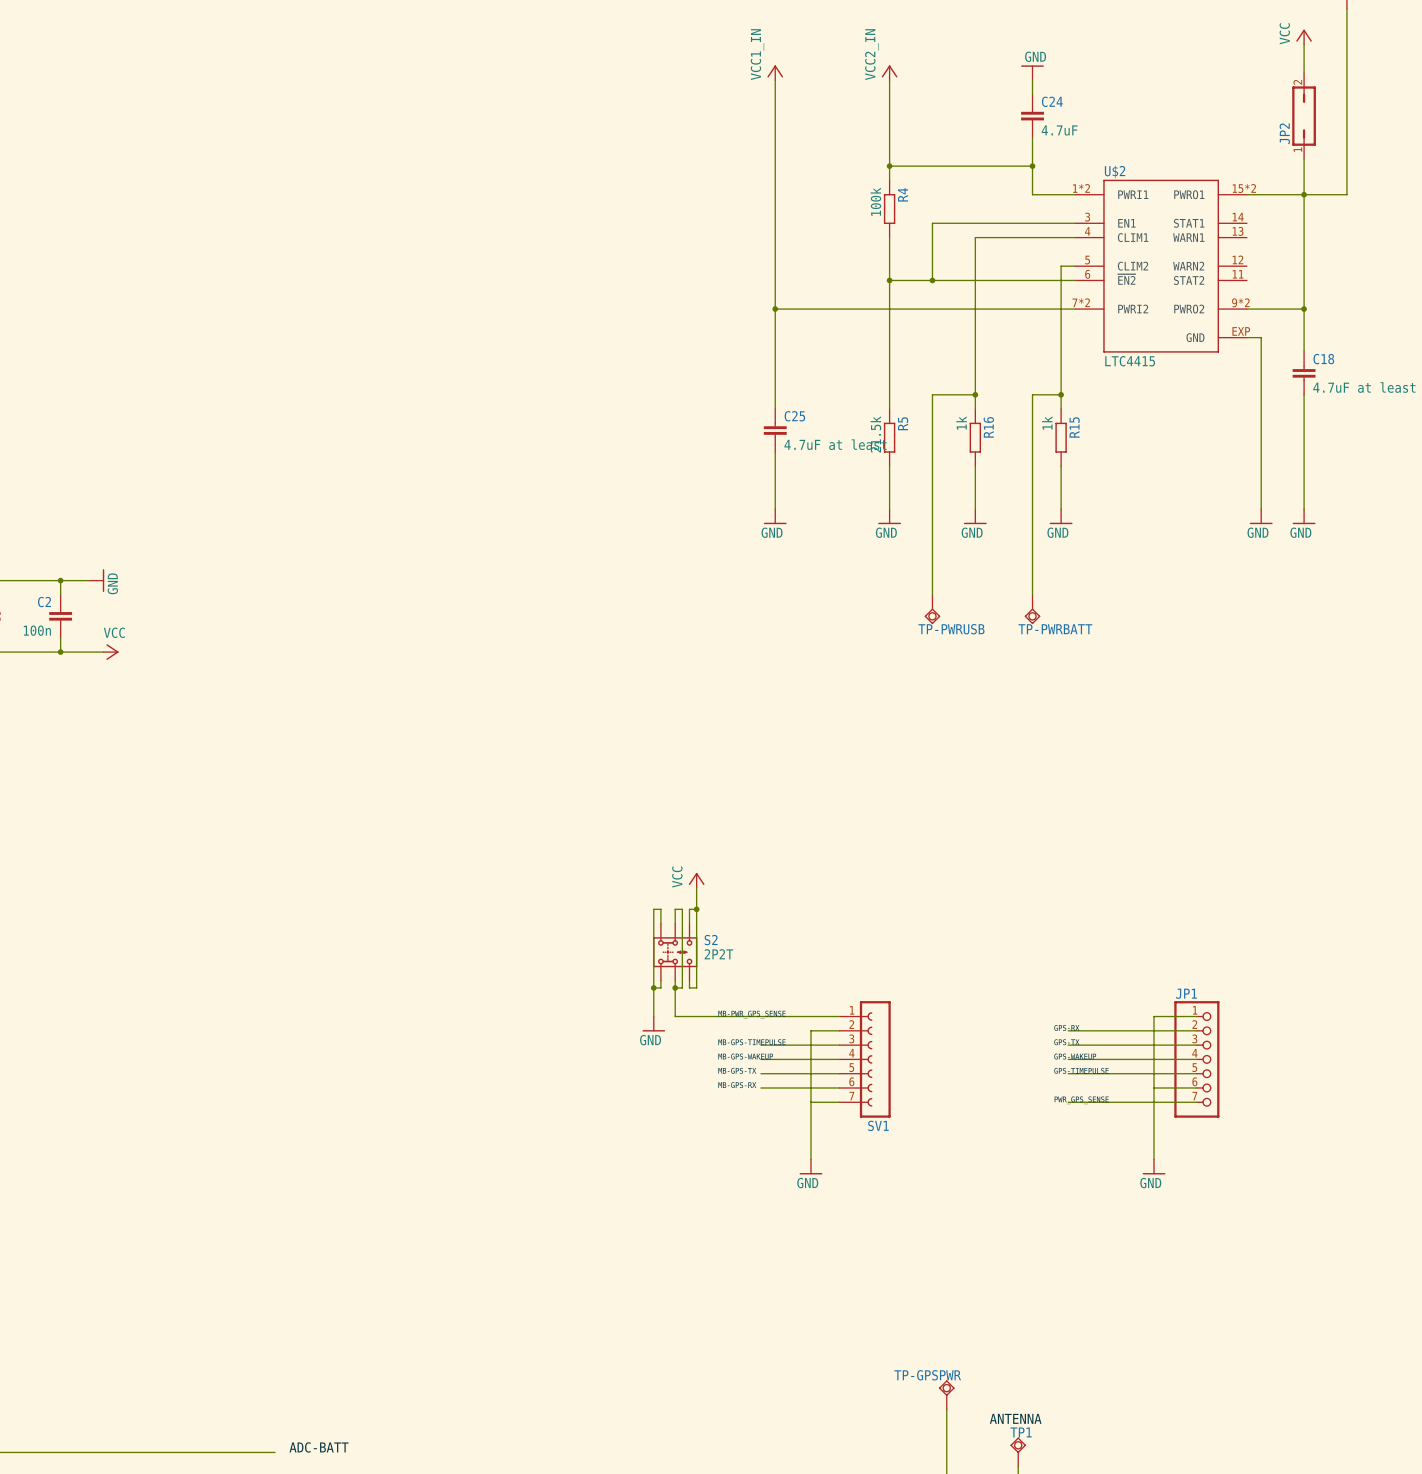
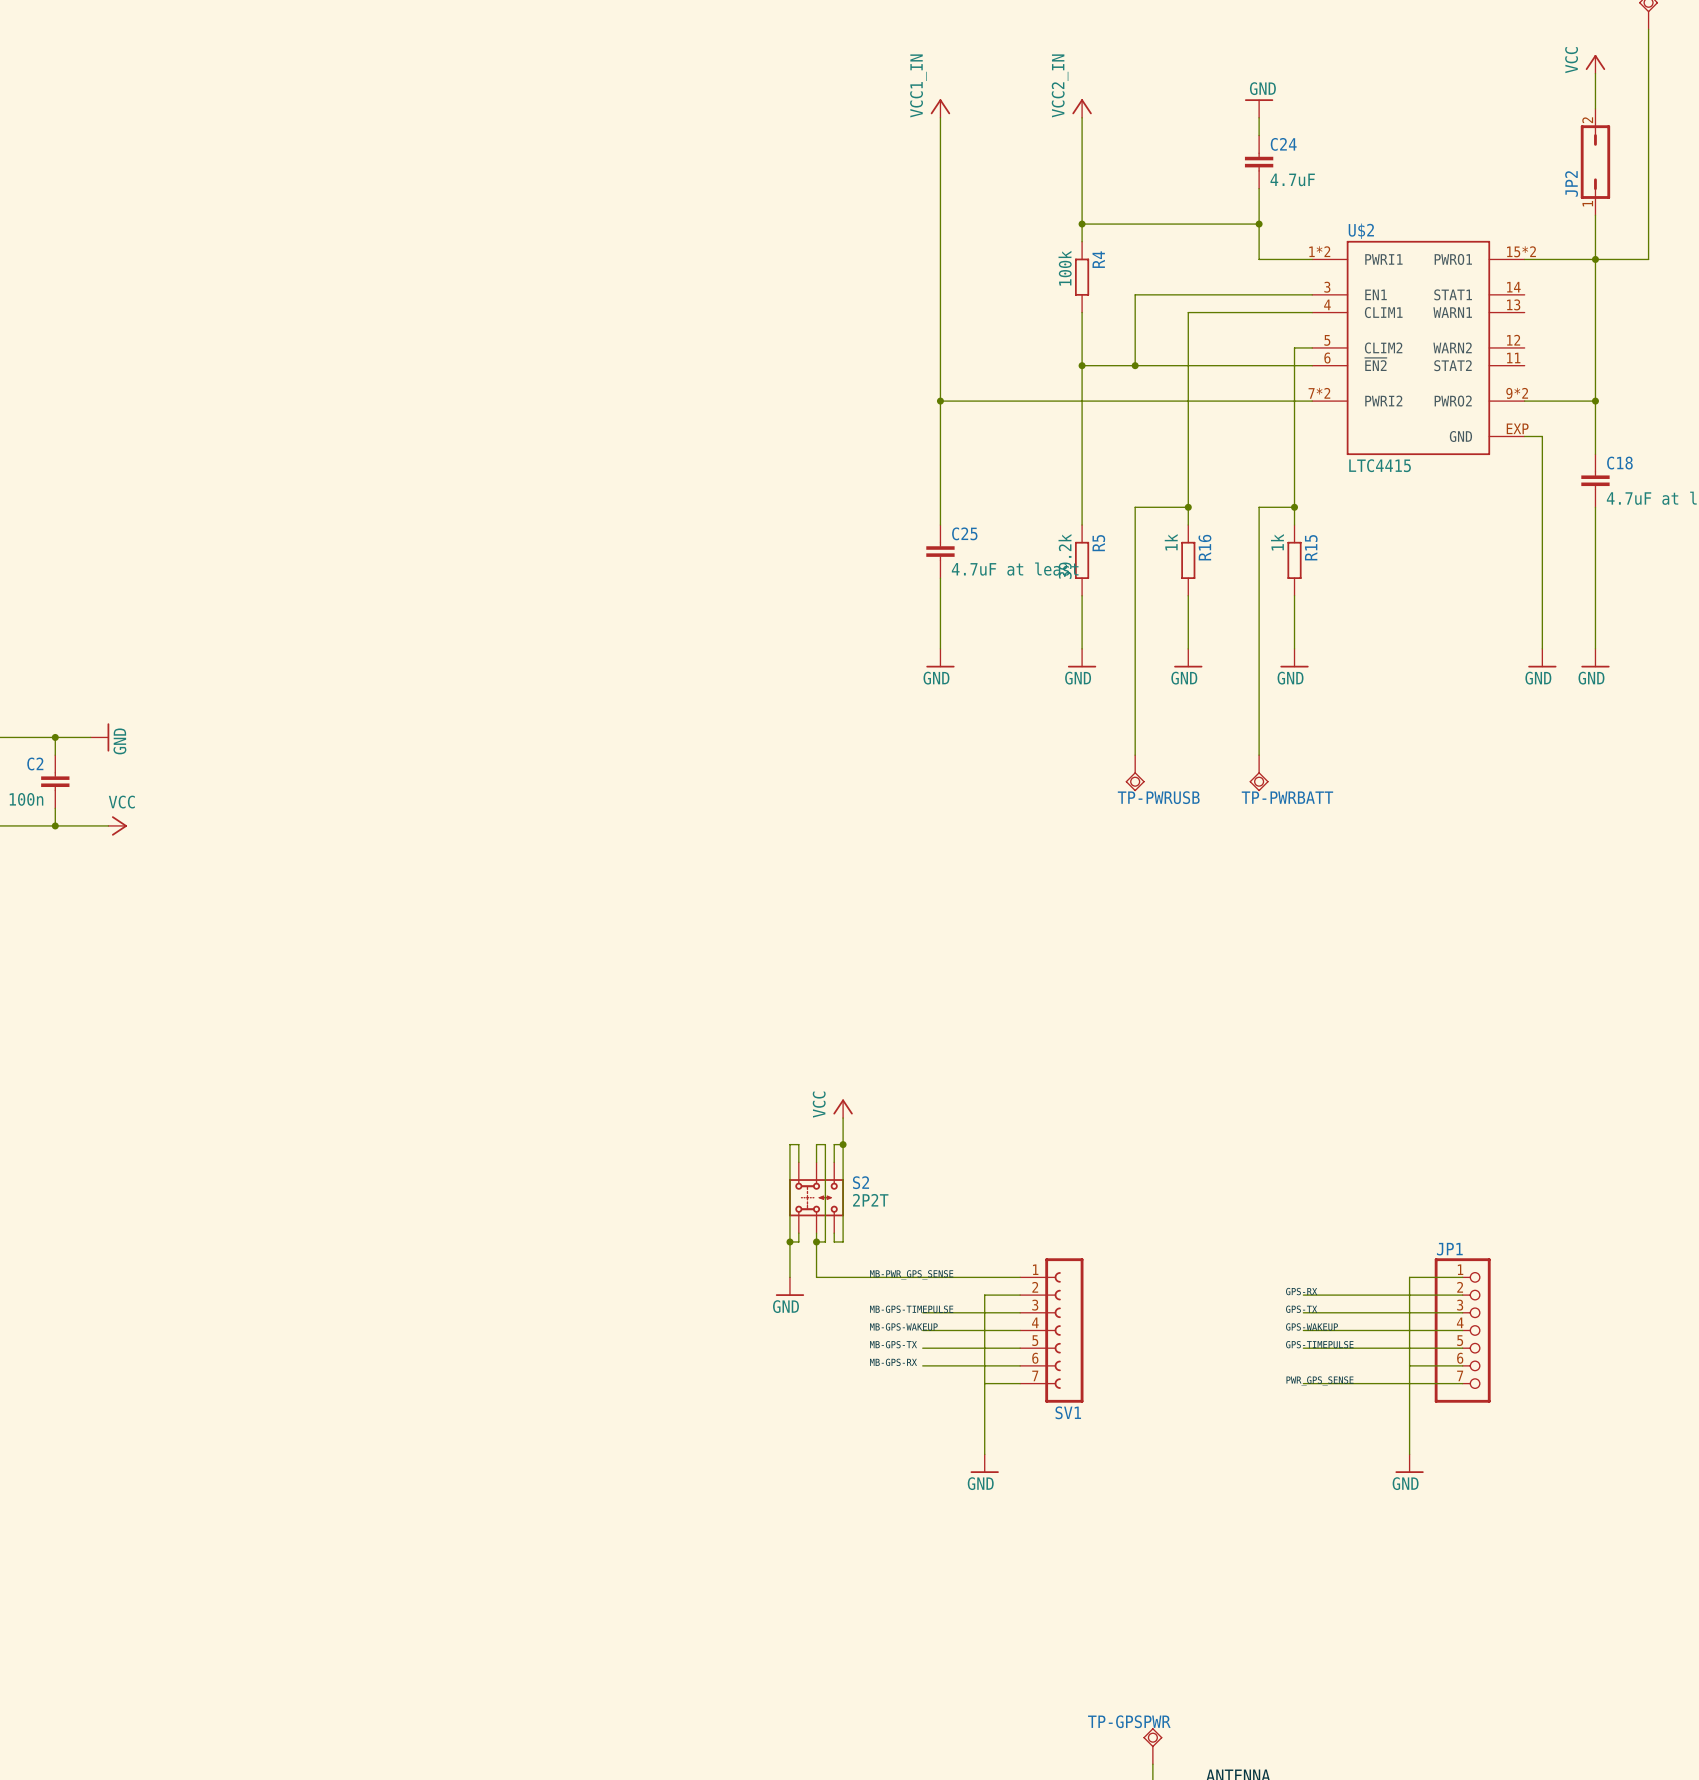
R5 value: 21.5k (875, 434) -> 39.2k (1065, 556)

